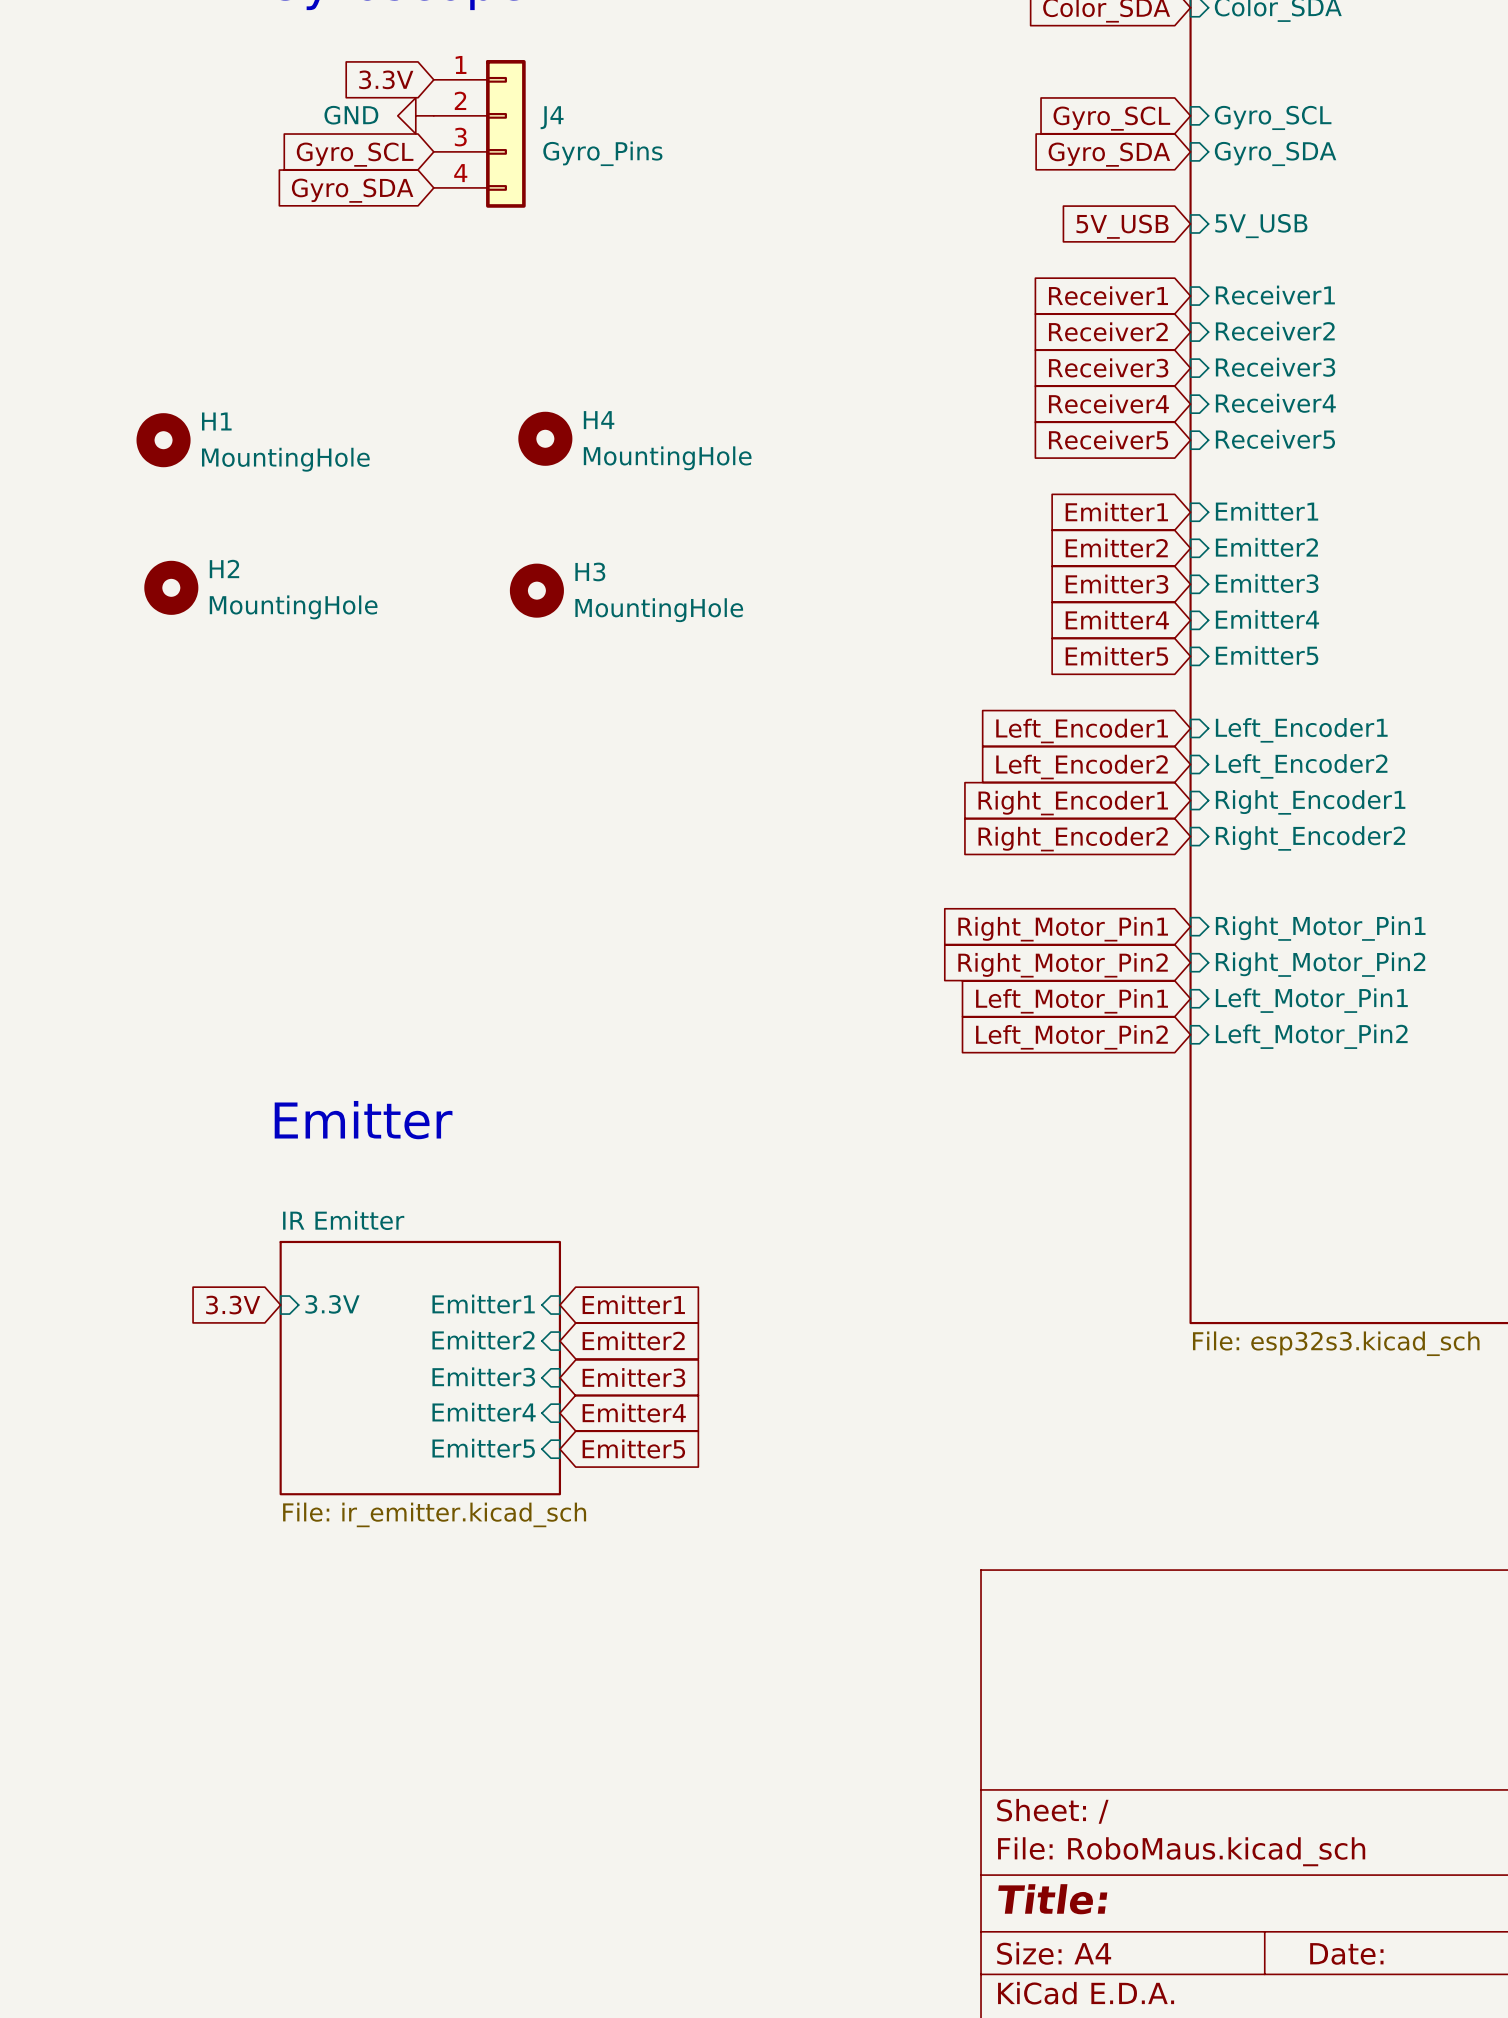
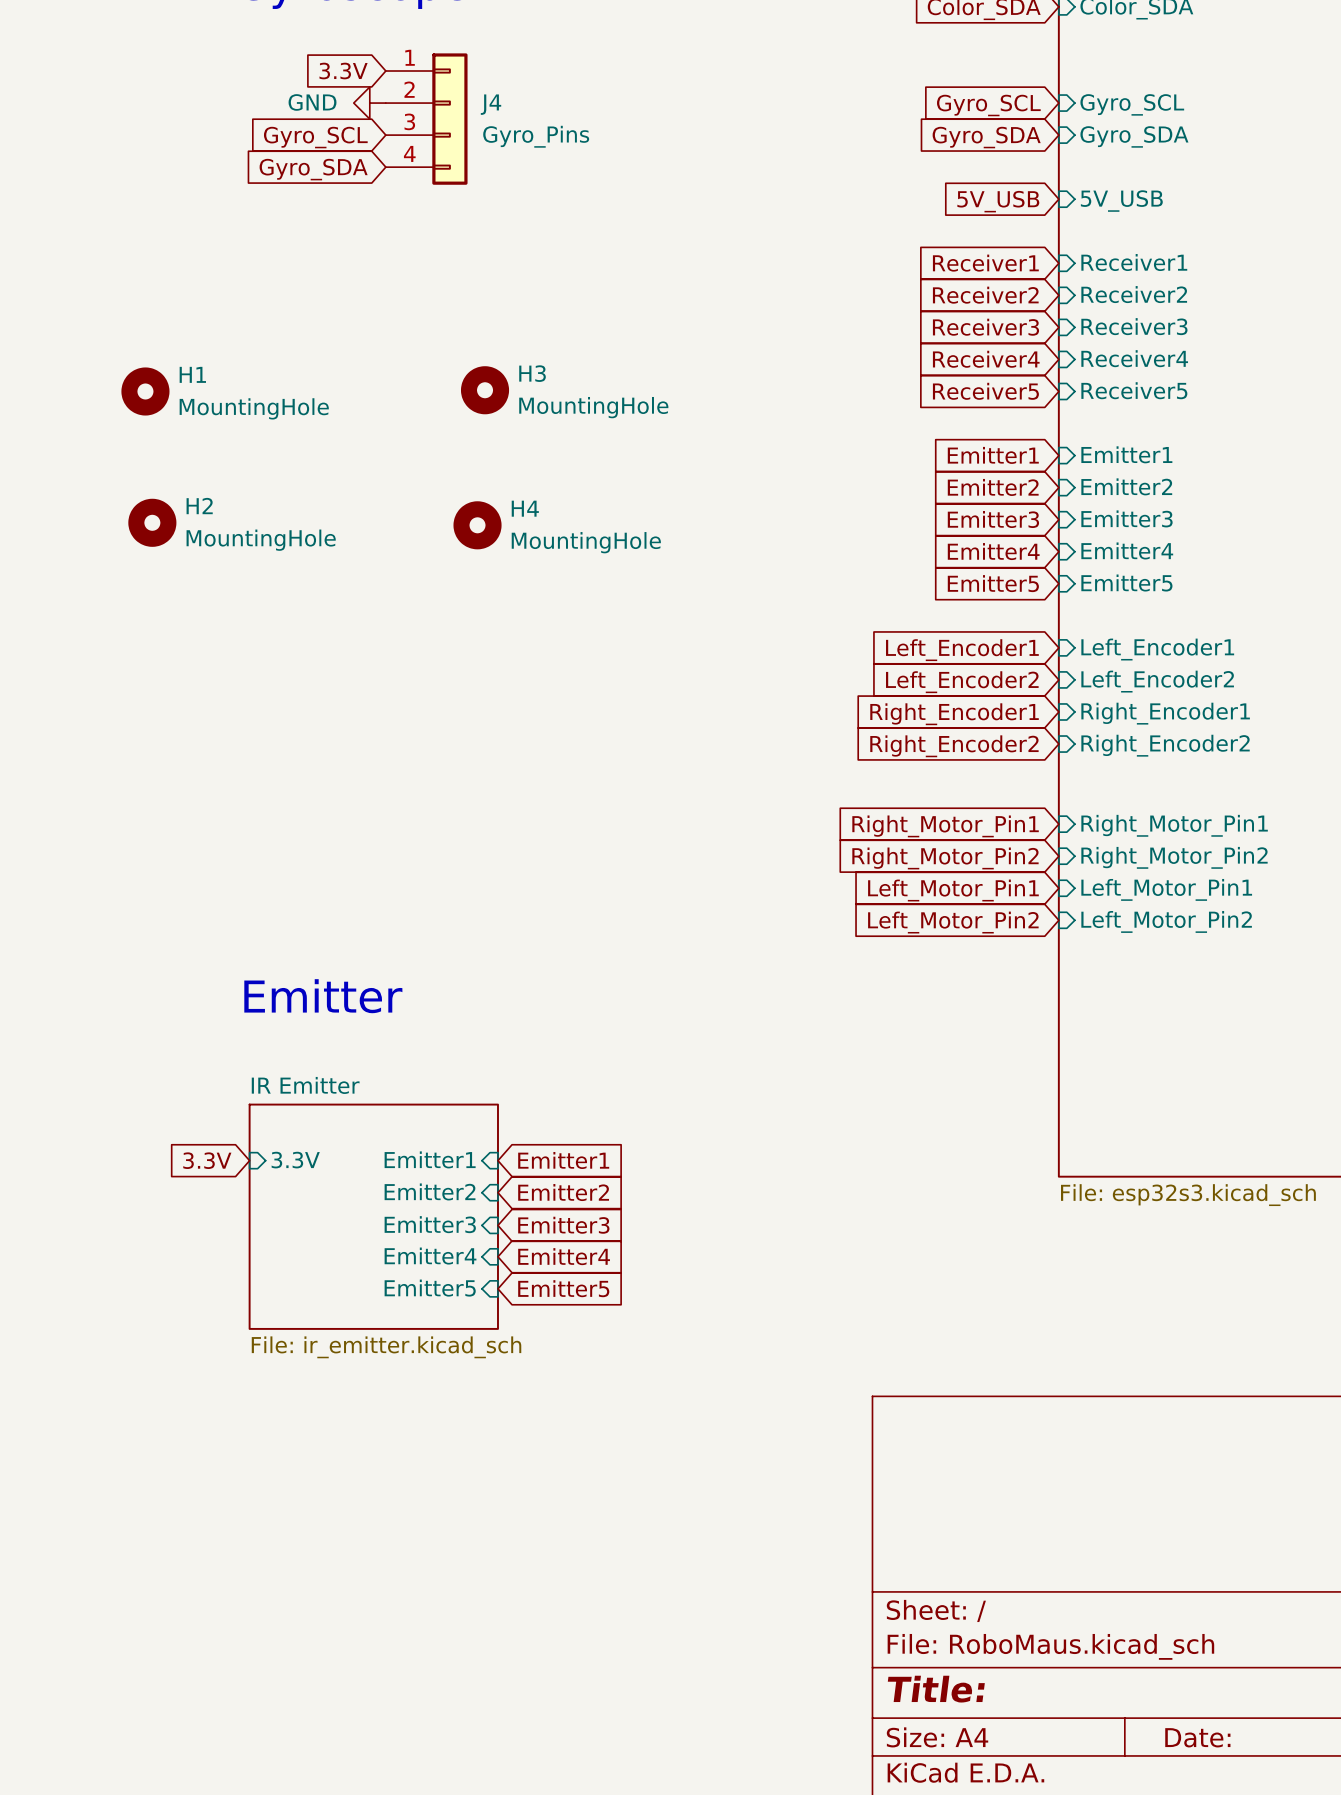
H4 name: H4 (599, 420) -> H3 (532, 373)
H3 name: H3 (590, 571) -> H4 (525, 508)

